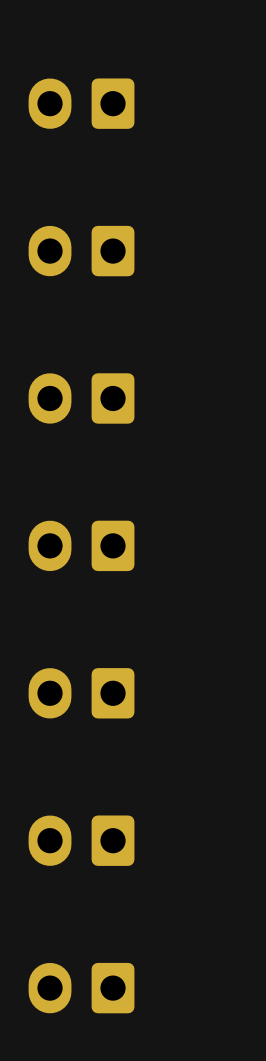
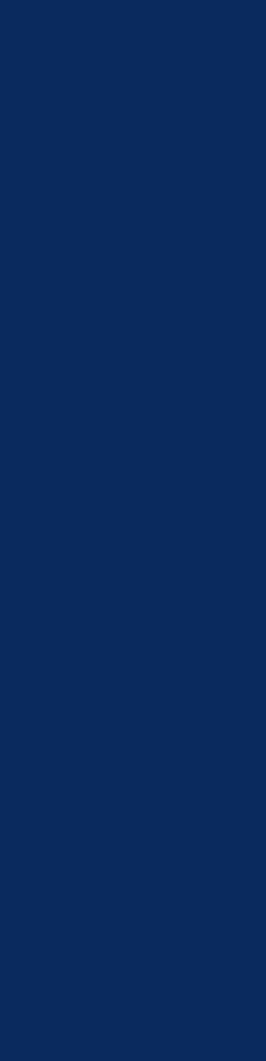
part: (81, 103) -> none
part: (81, 251) -> none
part: (81, 398) -> none
part: (81, 545) -> none
part: (81, 693) -> none
part: (81, 840) -> none
part: (81, 988) -> none

